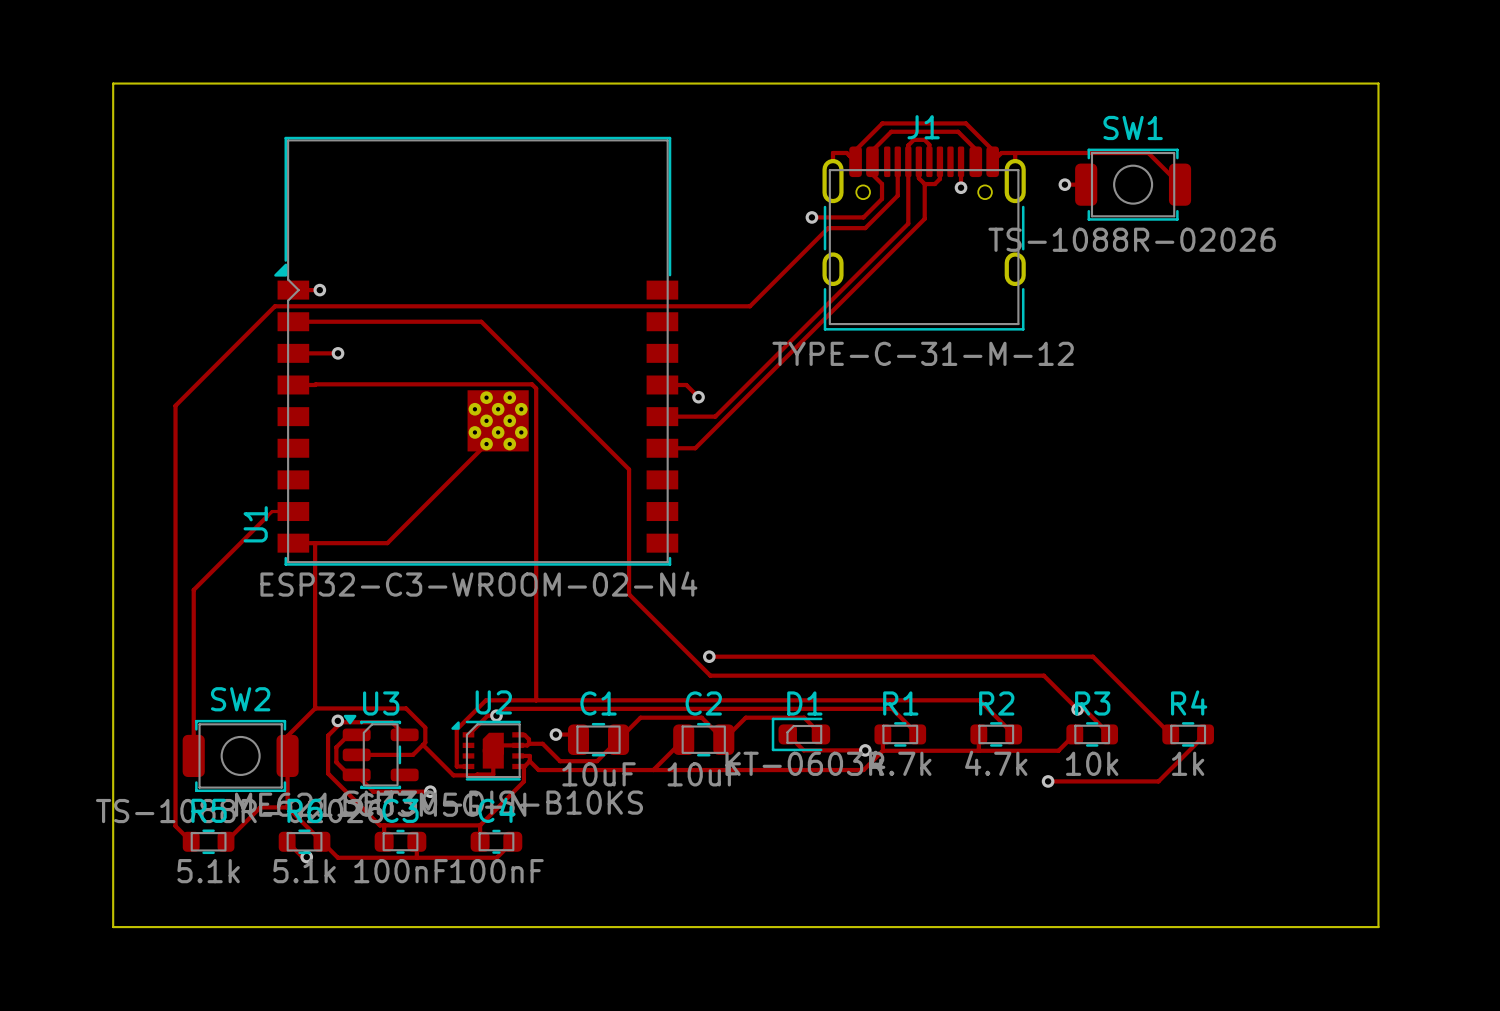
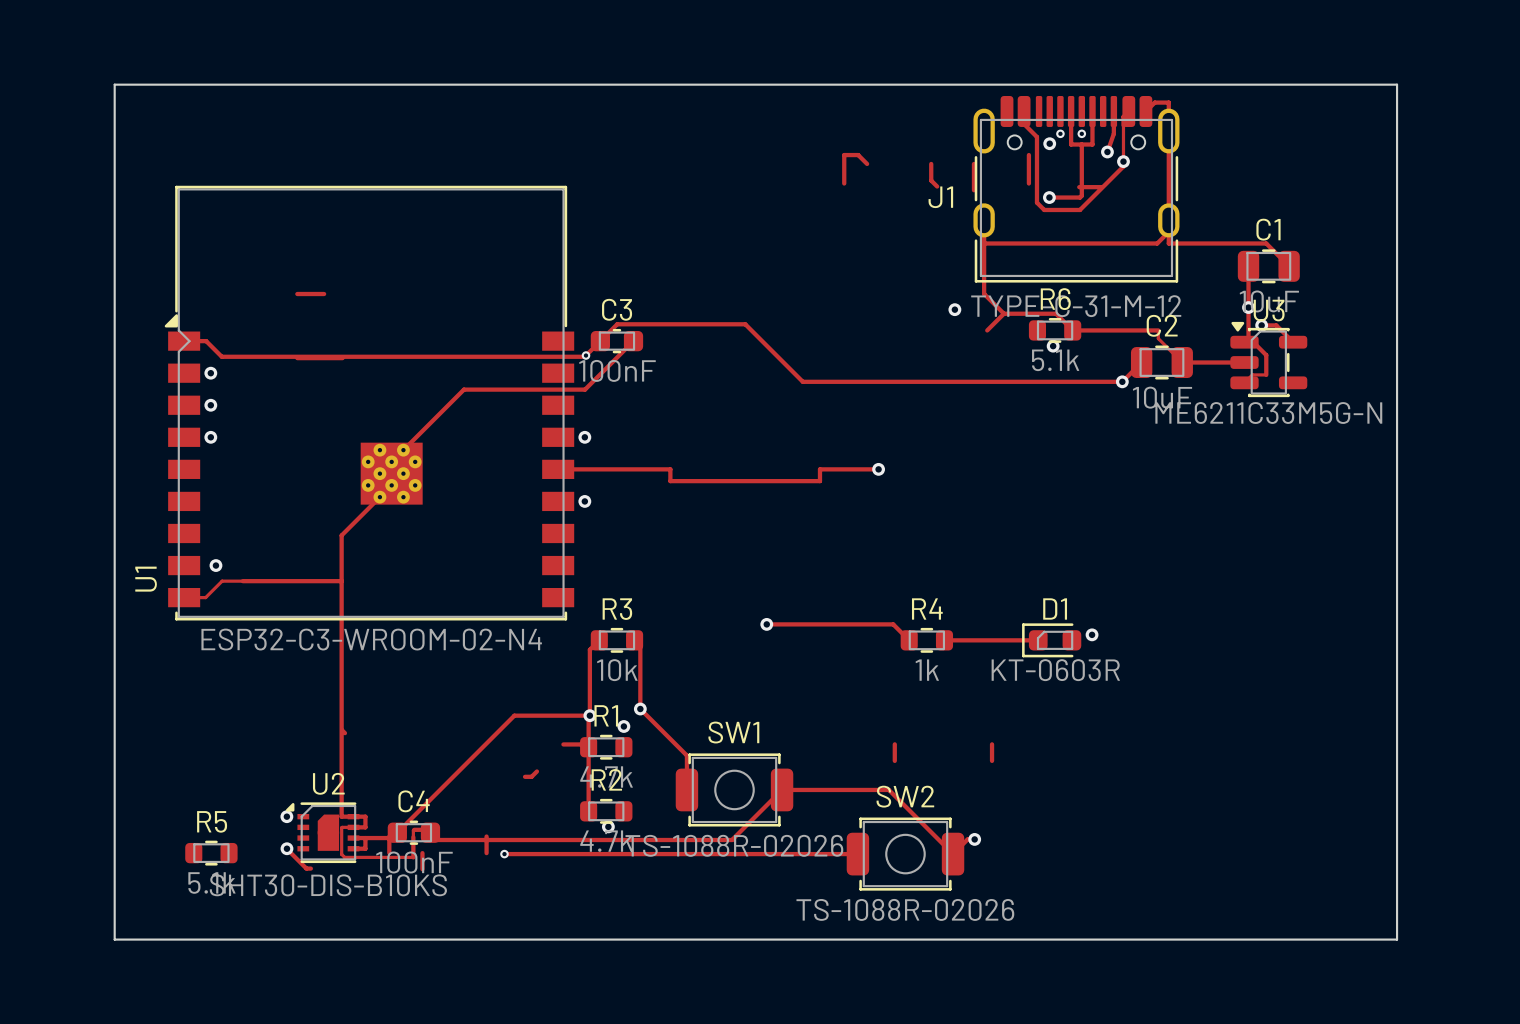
track: none -> (1024, 111) (1024, 124) (1036, 136) (1036, 202) (1044, 209) (1080, 209) (1123, 166) (1123, 116) (1128, 111)
track: none -> (1071, 111) (1071, 144) (1092, 144) (1092, 111)
track: none -> (1113, 111) (1113, 133) (1107, 151)
track: none -> (1145, 111) (1154, 102) (1168, 102) (1168, 243) (1266, 243) (1289, 266)
J1 name position: J1 (923, 127) -> J1 (940, 197)
via: none -> (1060, 133)
via: none -> (1081, 133)
via: none -> (1049, 143)
track: none -> (1081, 144) (1081, 195) (1080, 197) (1049, 197)
via: none -> (1107, 151)
track: (849, 156) (882, 123) (965, 123) (992, 150) (992, 161) (1001, 152) (1148, 152) (1180, 184) -> none
via: none -> (1123, 161)
track: (897, 161) (897, 195) (865, 228) (828, 228) (750, 306) (274, 306) (175, 405) (175, 826) (191, 841) -> none
track: (929, 161) (929, 144) (924, 139) (913, 139) (908, 145) (908, 223) (715, 416) (662, 416) -> none
track: (939, 161) (939, 178) (934, 184) (924, 184) (924, 218) (695, 448) (662, 448) -> none
track: (975, 161) (975, 149) (958, 131) (891, 131) (872, 150) (872, 174) (882, 184) (882, 198) (863, 217) (811, 217) -> none
via: (1064, 184) -> none
SW1 position: (1133, 184) -> (734, 789)
via: (961, 187) -> none
via: none -> (1049, 197)
via: (811, 217) -> none
track: none -> (984, 220) (984, 293) (1003, 313)
track: none -> (1168, 231) (1157, 243) (984, 243)
J1 position: (924, 238) -> (1076, 189)
track: none -> (1248, 266) (1248, 338) (1244, 342) (1253, 342) (1266, 355) (1266, 374) (1252, 374) (1244, 382)
via: (319, 290) -> none
via: none -> (1248, 307)
via: none -> (954, 309)
track: none -> (1003, 313) (987, 330)
track: none -> (1003, 313) (1056, 313) (1072, 330) (1158, 330) (1158, 338) (1182, 362) (1244, 362)
track: (293, 321) (481, 321) (629, 469) (629, 594) (710, 675) (1043, 675) (1077, 709) (1084, 709) (1109, 734) -> none
track: none -> (1261, 325) (1276, 325) (1293, 342)
via: none -> (1261, 325)
track: none -> (184, 341) (206, 341) (221, 356) (584, 356) (617, 324) (745, 324) (802, 381) (1122, 381) (1141, 362)
track: none -> (633, 341) (585, 389) (463, 389) (403, 450)
via: none -> (1053, 346)
via: none -> (585, 355)
U1 position: (476, 351) -> (369, 403)
via: (338, 353) -> none
via: none -> (210, 373)
via: none -> (1122, 381)
track: (293, 385) (532, 384) (536, 388) (536, 700) -> none
track: (662, 385) (686, 385) (698, 397) -> none
via: (698, 397) -> none
via: none -> (210, 405)
via: none -> (210, 437)
via: none -> (584, 437)
track: (486, 444) (387, 543) (293, 543) -> none
track: none -> (558, 469) (670, 469) (670, 481) (819, 481) (819, 469) (878, 469)
via: none -> (878, 469)
track: none -> (379, 497) (341, 535) (341, 816) (365, 816) (365, 827) (341, 827) (341, 854) (344, 857) (413, 857) (414, 829) (427, 829) (437, 840) (732, 840) (782, 789) (888, 789) (953, 854) (967, 839) (974, 839)
via: none -> (584, 501)
track: (293, 511) (272, 511) (193, 589) (193, 755) -> none
track: (315, 543) (315, 708) -> none
via: none -> (215, 565)
track: none -> (341, 581) (222, 581) (205, 597) (184, 597)
track: none -> (766, 624) (893, 624) (909, 640)
via: none -> (766, 624)
via: none -> (1092, 634)
track: none -> (599, 640) (589, 649) (589, 715)
track: none -> (634, 640) (640, 646) (640, 709) (686, 755) (686, 789)
track: none -> (944, 640) (1038, 640)
track: (709, 656) (1093, 656) (1170, 734) -> none
via: (709, 656) -> none
via: none -> (640, 709)
track: none -> (589, 715) (588, 811)
track: none -> (589, 715) (514, 715) (392, 838) (353, 838)
via: none -> (589, 715)
track: (315, 708) (287, 736) (287, 807) -> none
track: (315, 708) (406, 708) (425, 727) (425, 742) (413, 754) (356, 754) -> none
via: (1077, 709) -> none
via: (496, 715) -> none
via: none -> (623, 726)
via: (337, 720) -> none
track: (356, 734) (348, 734) (336, 747) (336, 762) (349, 774) (356, 774) (373, 791) (430, 791) -> none
track: (404, 734) (392, 722) (341, 722) (328, 735) (328, 773) (379, 825) (480, 825) (523, 781) (523, 766) -> none
track: (518, 734) (524, 734) (528, 739) (528, 743) -> none
via: (555, 734) -> none
track: (787, 734) (803, 750) (865, 750) -> none
D1 position: (800, 734) -> (1051, 640)
track: (820, 734) (804, 717) (745, 717) (723, 739) (701, 717) (640, 717) (597, 761) (560, 761) (542, 743) (528, 743) -> none
R1 position: (900, 734) -> (606, 747)
track: (917, 734) (892, 708) (503, 708) (496, 715) (487, 715) (468, 734) -> none
R2 position: (996, 734) -> (606, 811)
track: (1013, 734) (979, 700) (485, 700) (456, 729) (456, 766) (468, 766) -> none
track: (1074, 734) (1058, 750) (882, 750) (863, 770) (538, 770) (529, 761) (529, 755) (518, 755) -> none
R3 position: (1092, 734) -> (616, 640)
R4 position: (1188, 734) -> (926, 640)
track: (1205, 734) (1158, 781) (1048, 781) -> none
C1 position: (598, 739) -> (1268, 266)
track: (683, 739) (653, 770) -> none
C2 position: (703, 739) -> (1161, 362)
track: (528, 743) (527, 745) (498, 745) (493, 750) (493, 774) (476, 775) (453, 775) (423, 744) -> none
U2 position: (487, 750) -> (322, 832)
via: (865, 750) -> none
U3 position: (380, 751) -> (1268, 359)
SW2 position: (240, 755) -> (905, 854)
via: (1048, 781) -> none
via: (430, 791) -> none
via: none -> (286, 816)
track: (287, 807) (337, 857) (496, 857) (512, 841) -> none
track: (287, 807) (260, 807) (225, 841) -> none
via: none -> (608, 826)
track: none -> (365, 838) (365, 848) (353, 848)
via: none -> (974, 839)
via: none -> (286, 848)
R6 position: (304, 841) -> (1055, 330)
C3 position: (400, 841) -> (616, 341)
C4 position: (496, 841) -> (413, 832)
track: none -> (504, 854) (857, 854)
via: none -> (504, 854)
via: (306, 857) -> none

